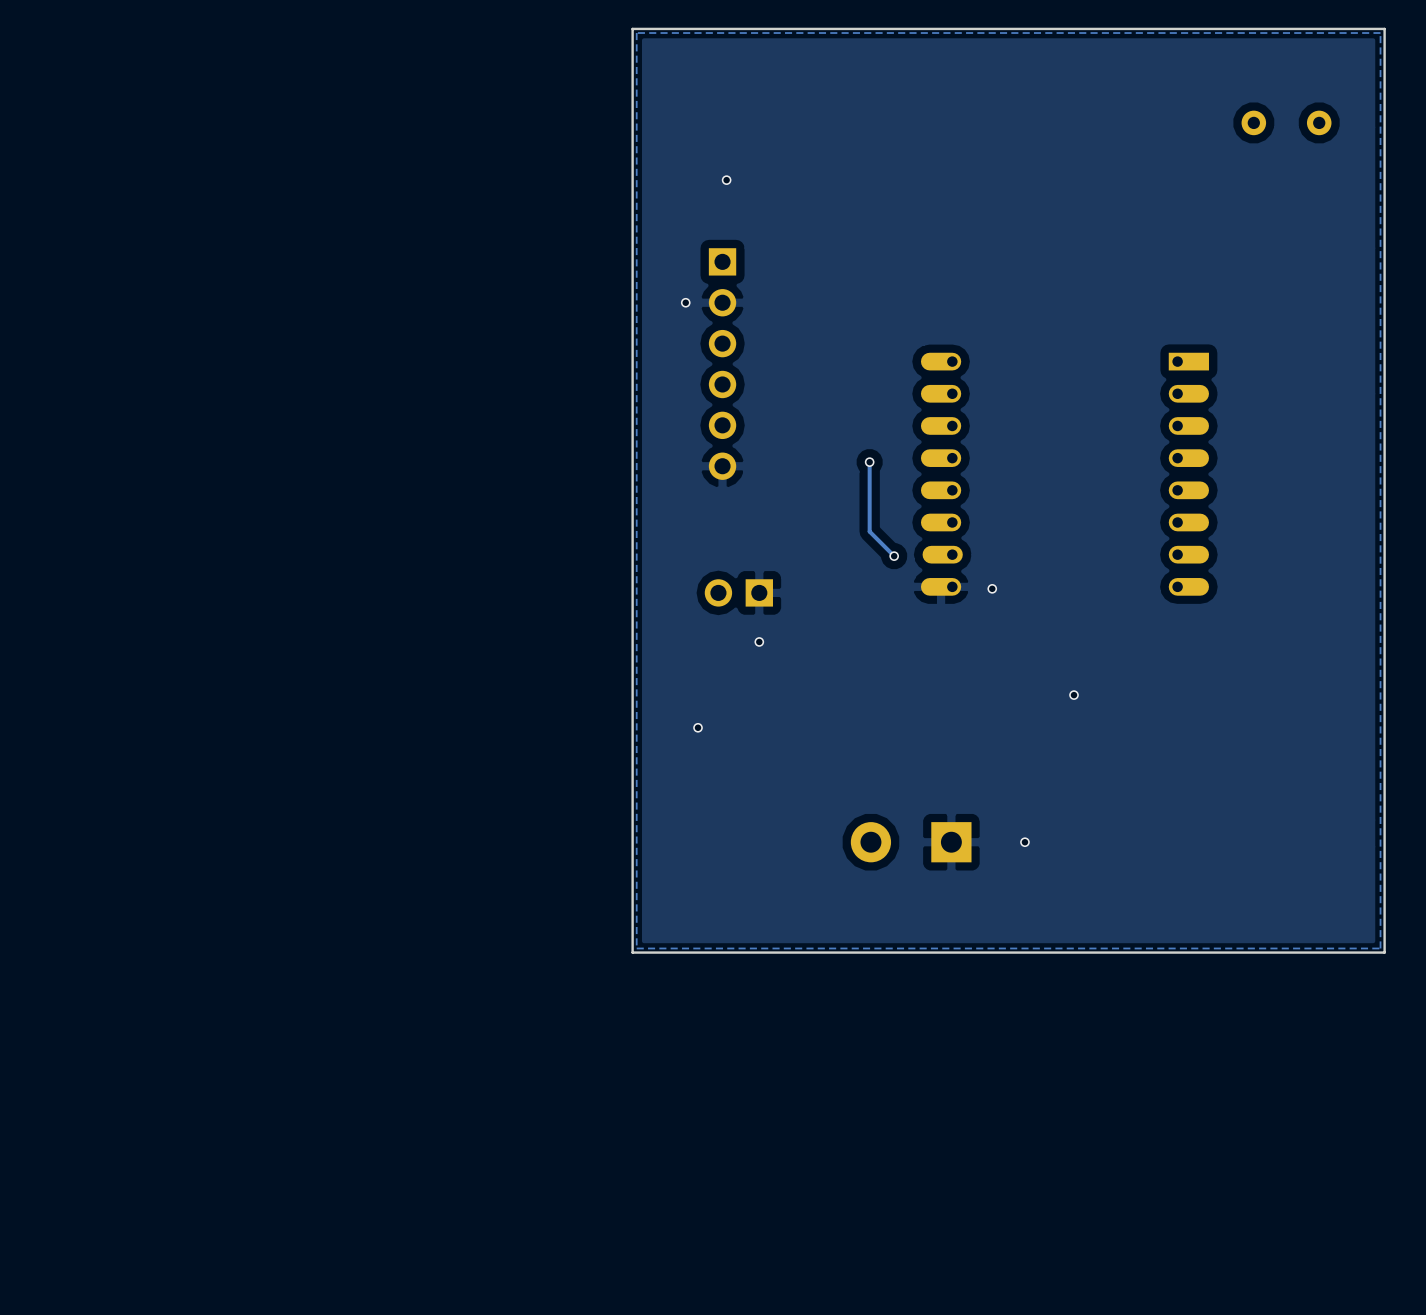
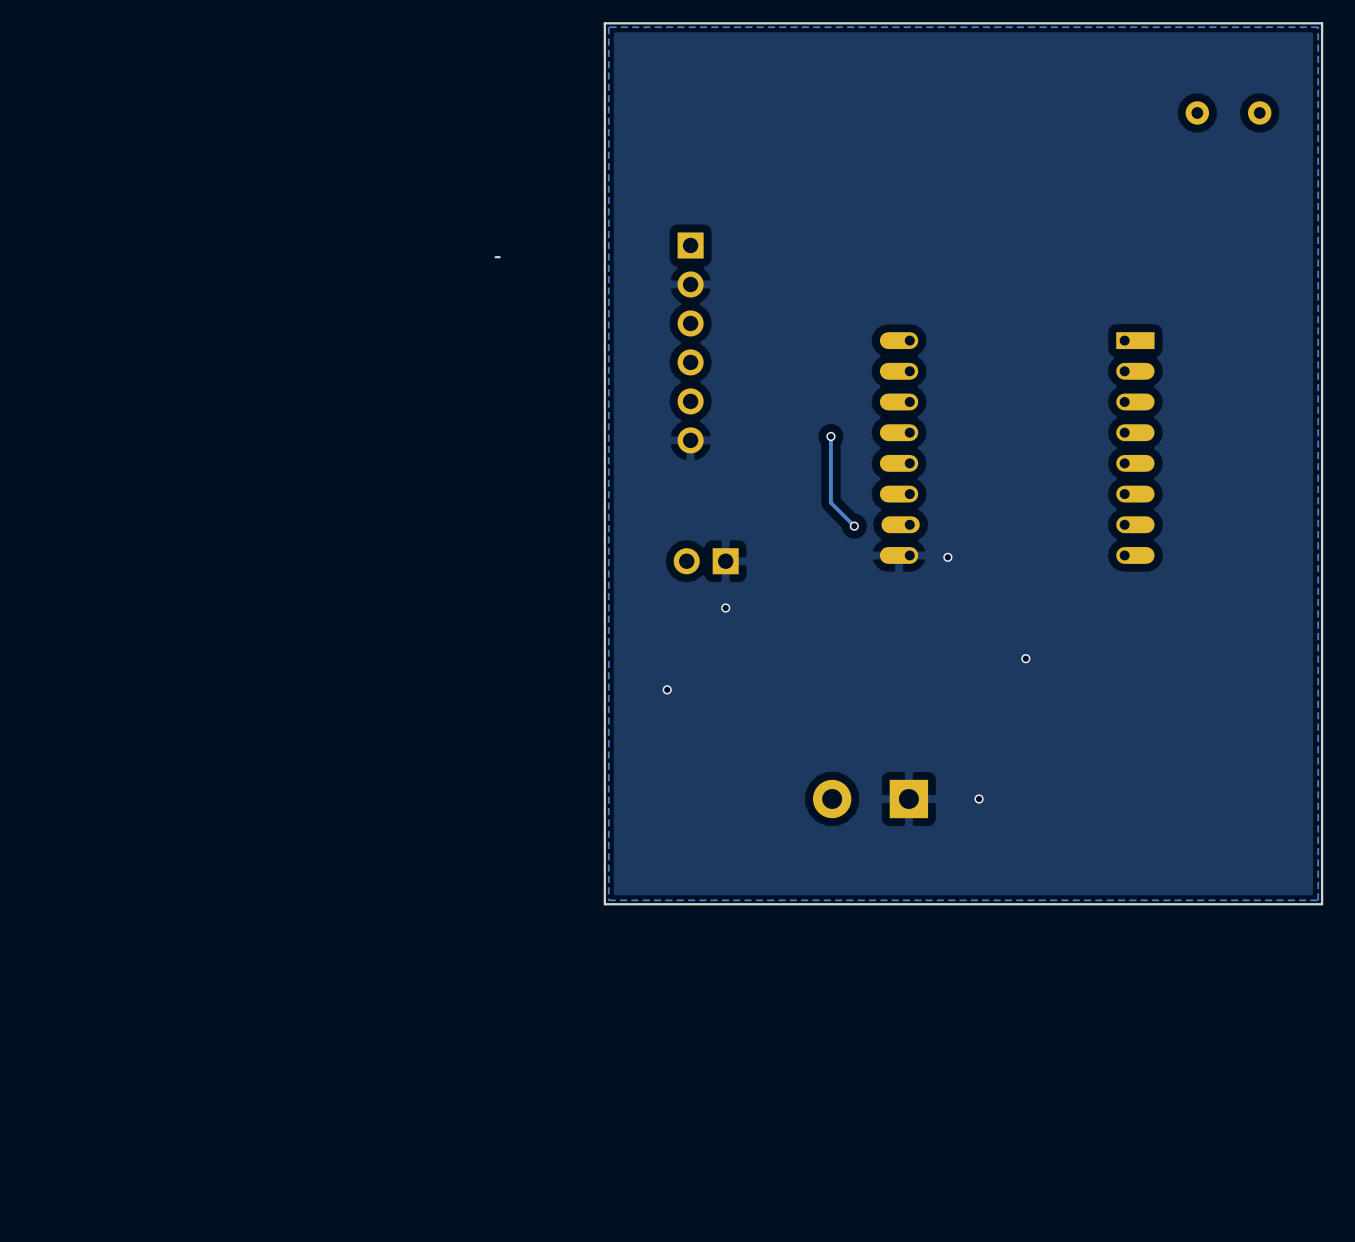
via: (726, 180) -> none
board edge: none -> (499, 257) (495, 257)
via: (685, 302) -> none

